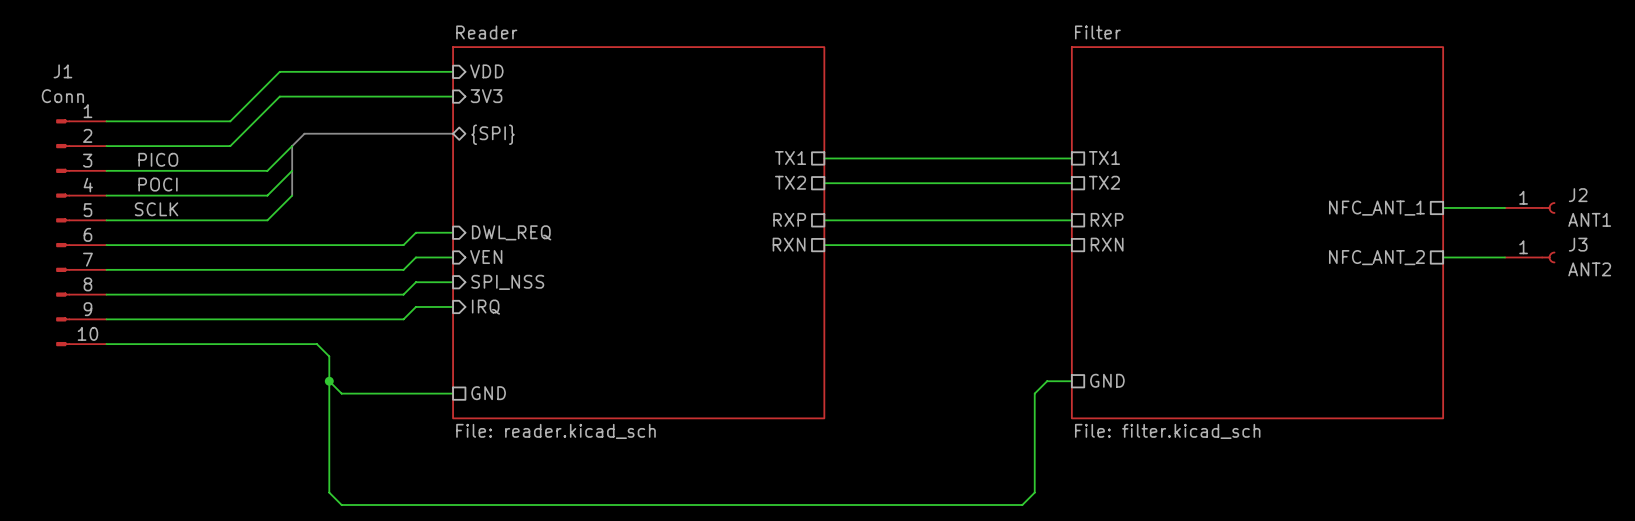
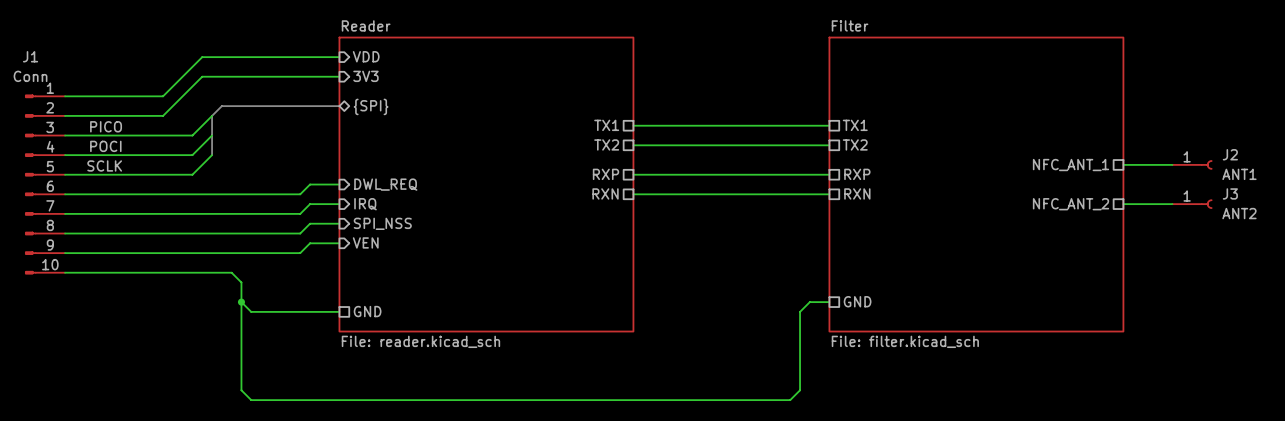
sheet pin: VEN (486, 257) -> IRQ (365, 204)
sheet pin: IRQ (485, 307) -> VEN (365, 242)

